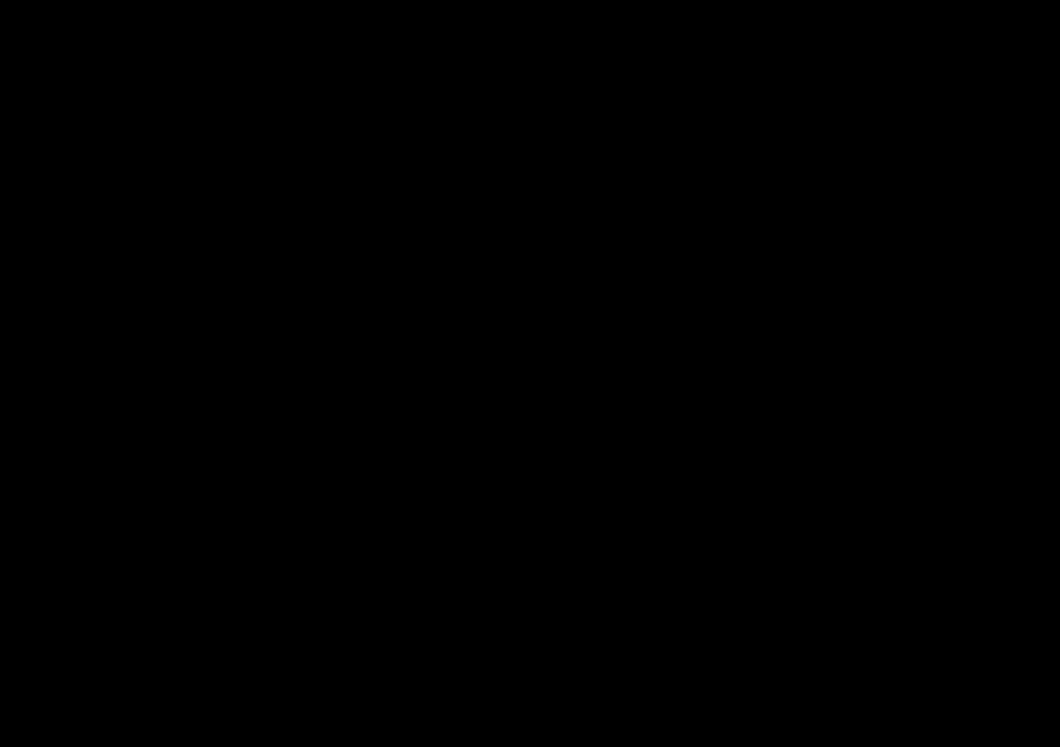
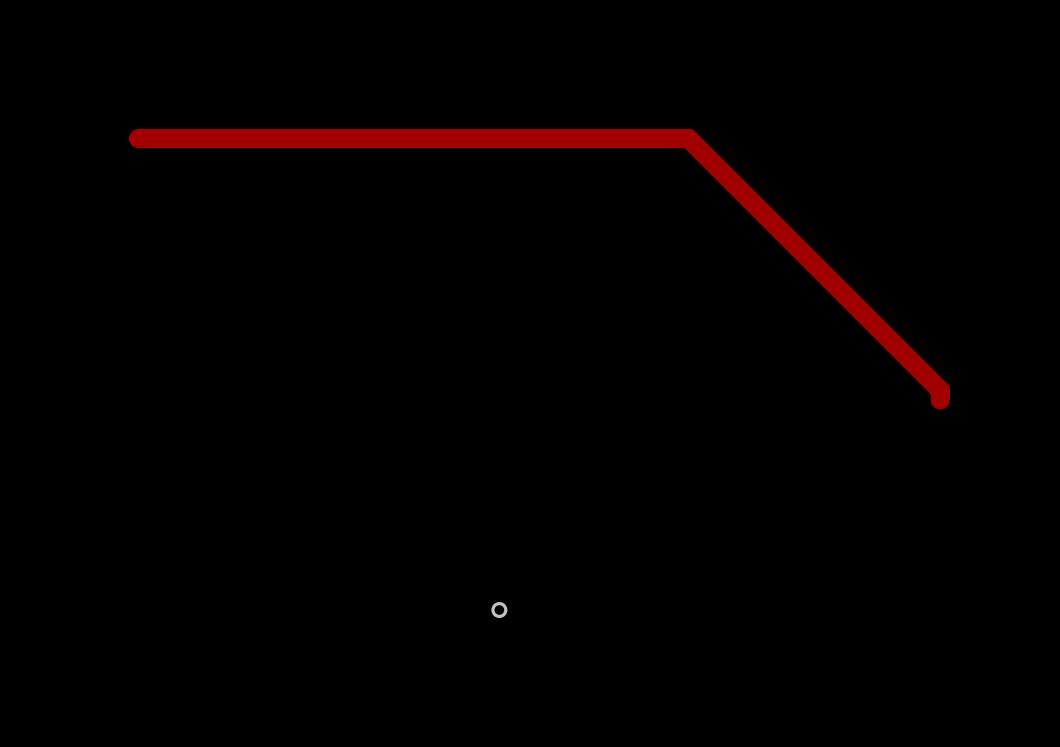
track: none -> (138, 138) (688, 138) (940, 390) (940, 399)
via: none -> (499, 610)

